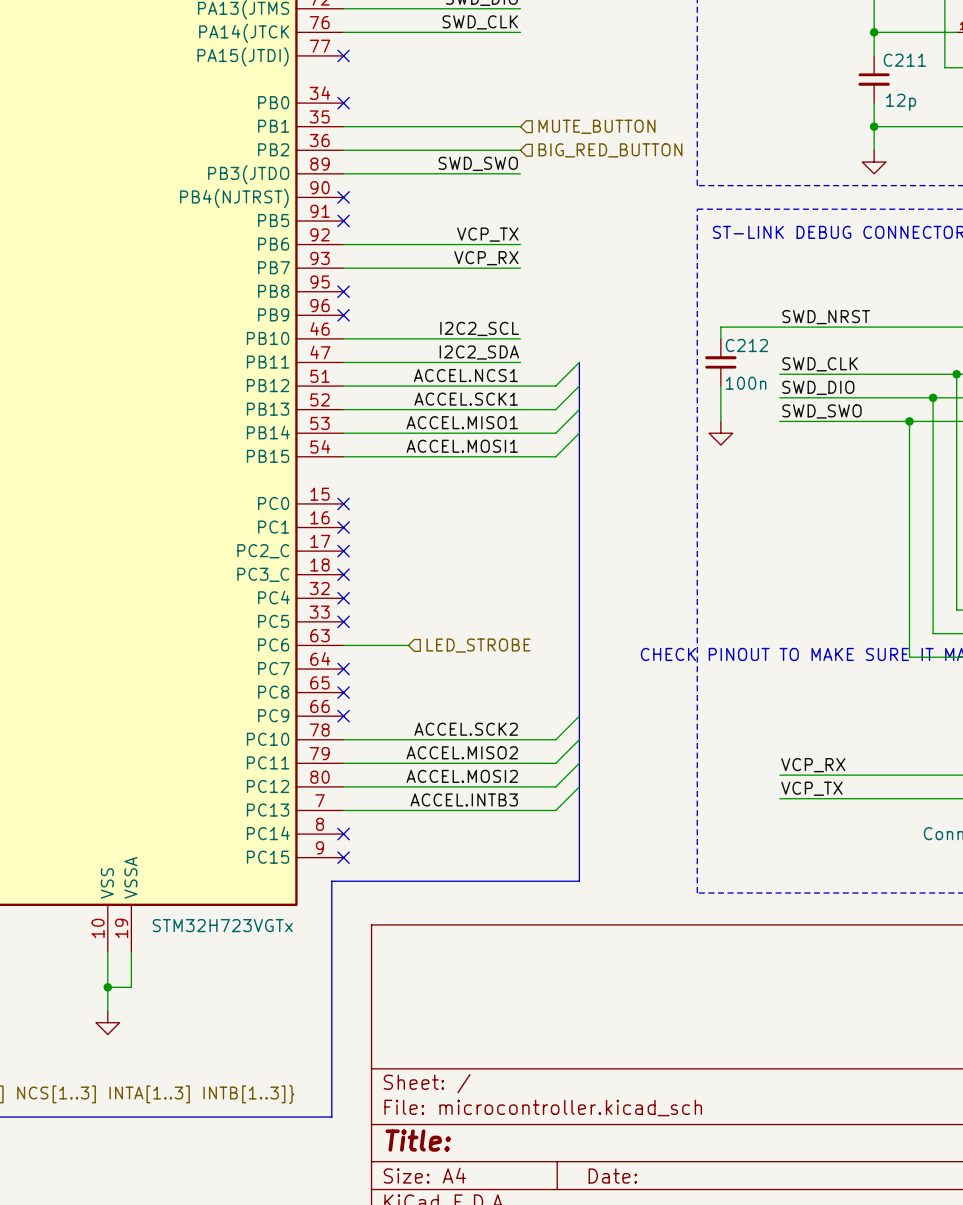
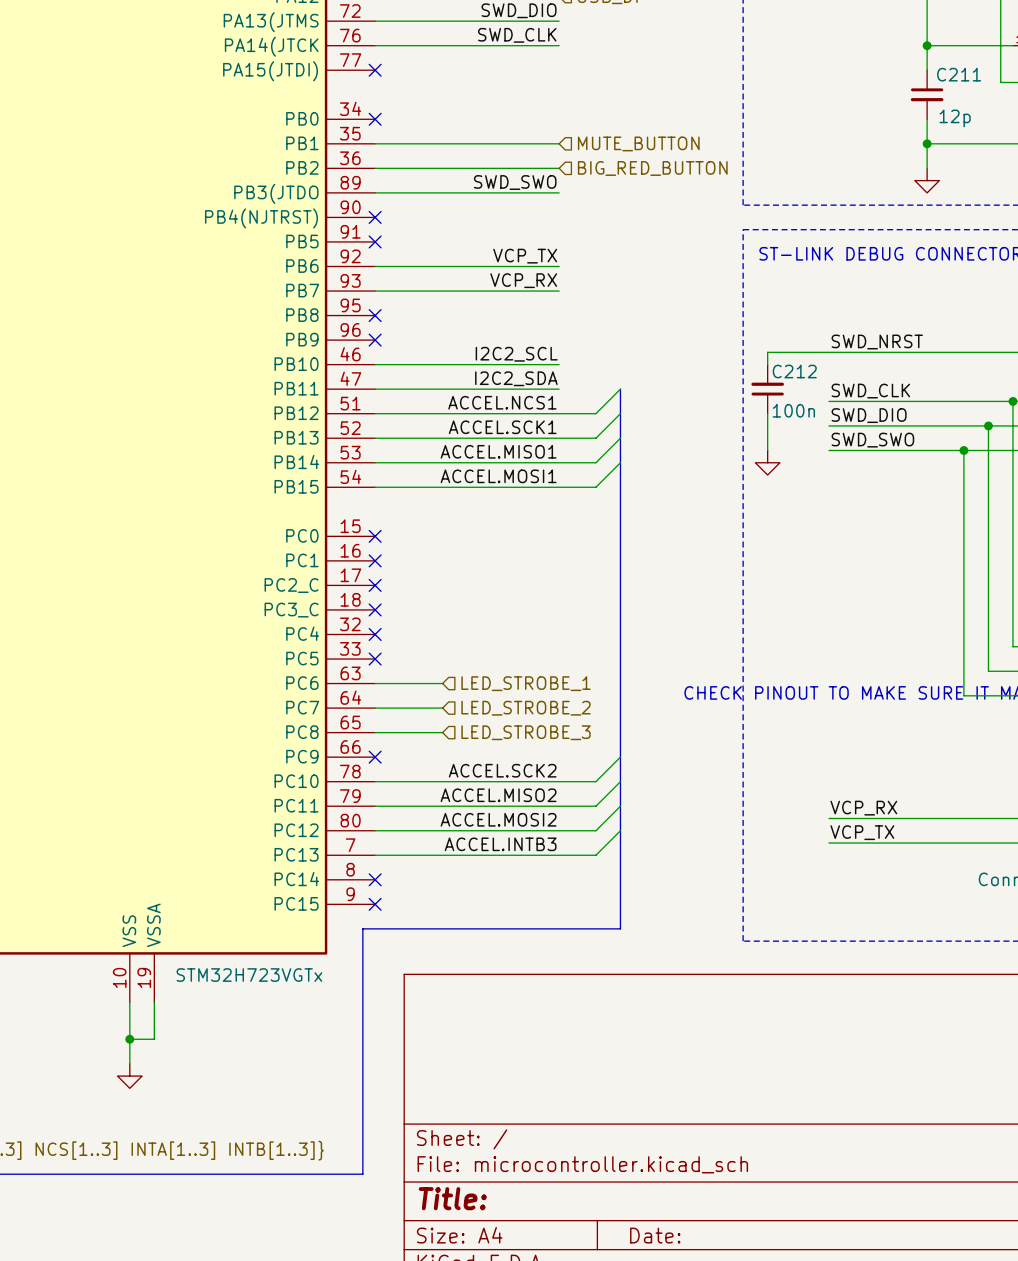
hierarchical label: LED_STROBE (478, 645) -> LED_STROBE_1 (526, 683)
wire: none -> (375, 708) (442, 708)
no-connect mark: (343, 669) -> none
hierarchical label: none -> LED_STROBE_2 (526, 708)
wire: none -> (375, 732) (442, 732)
no-connect mark: (343, 692) -> none
hierarchical label: none -> LED_STROBE_3 (526, 732)

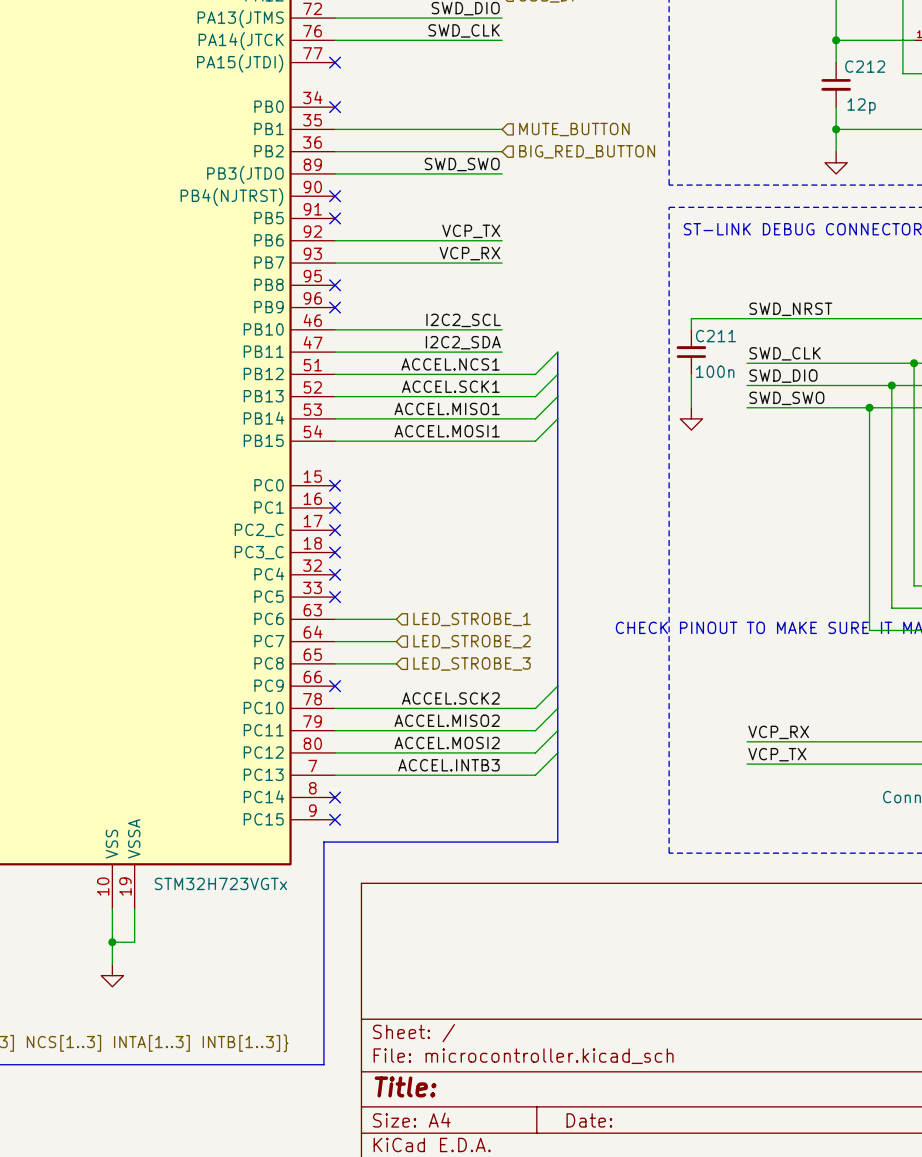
C211 name: C211 (959, 74) -> C212 (865, 66)
C212 name: C212 (794, 371) -> C211 (715, 336)

